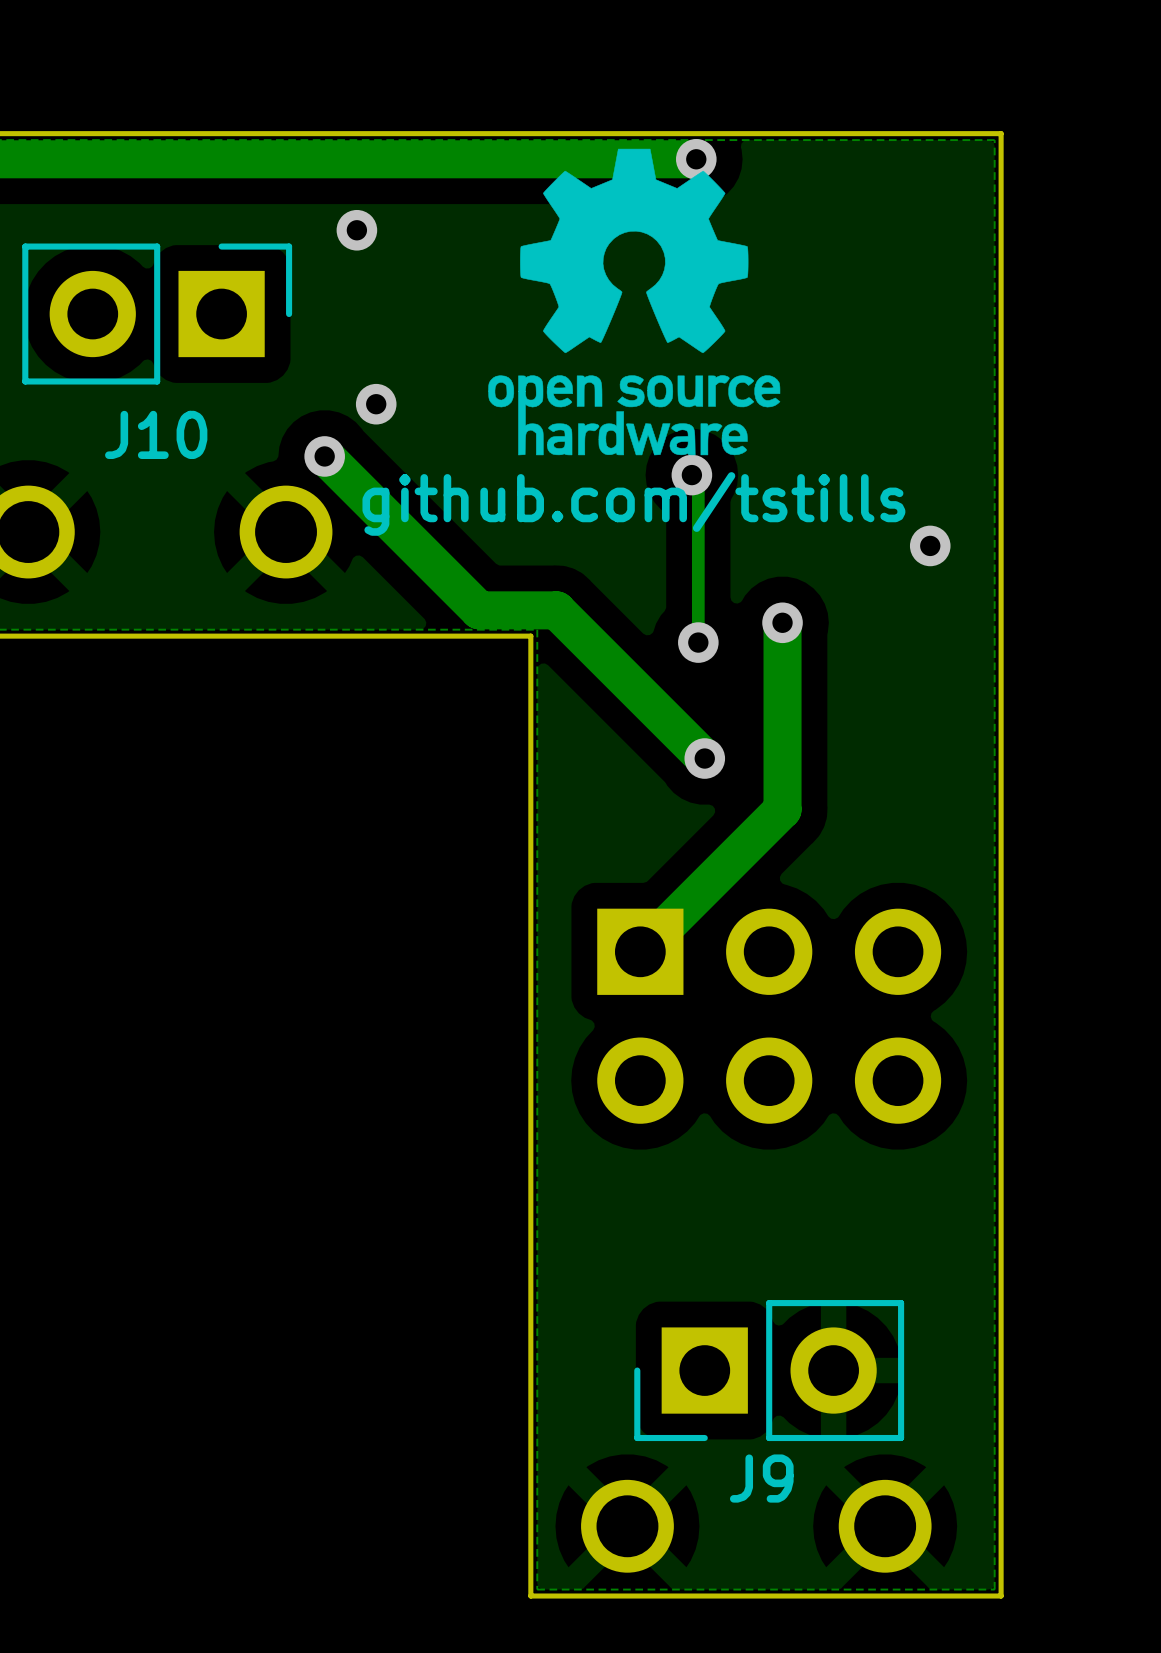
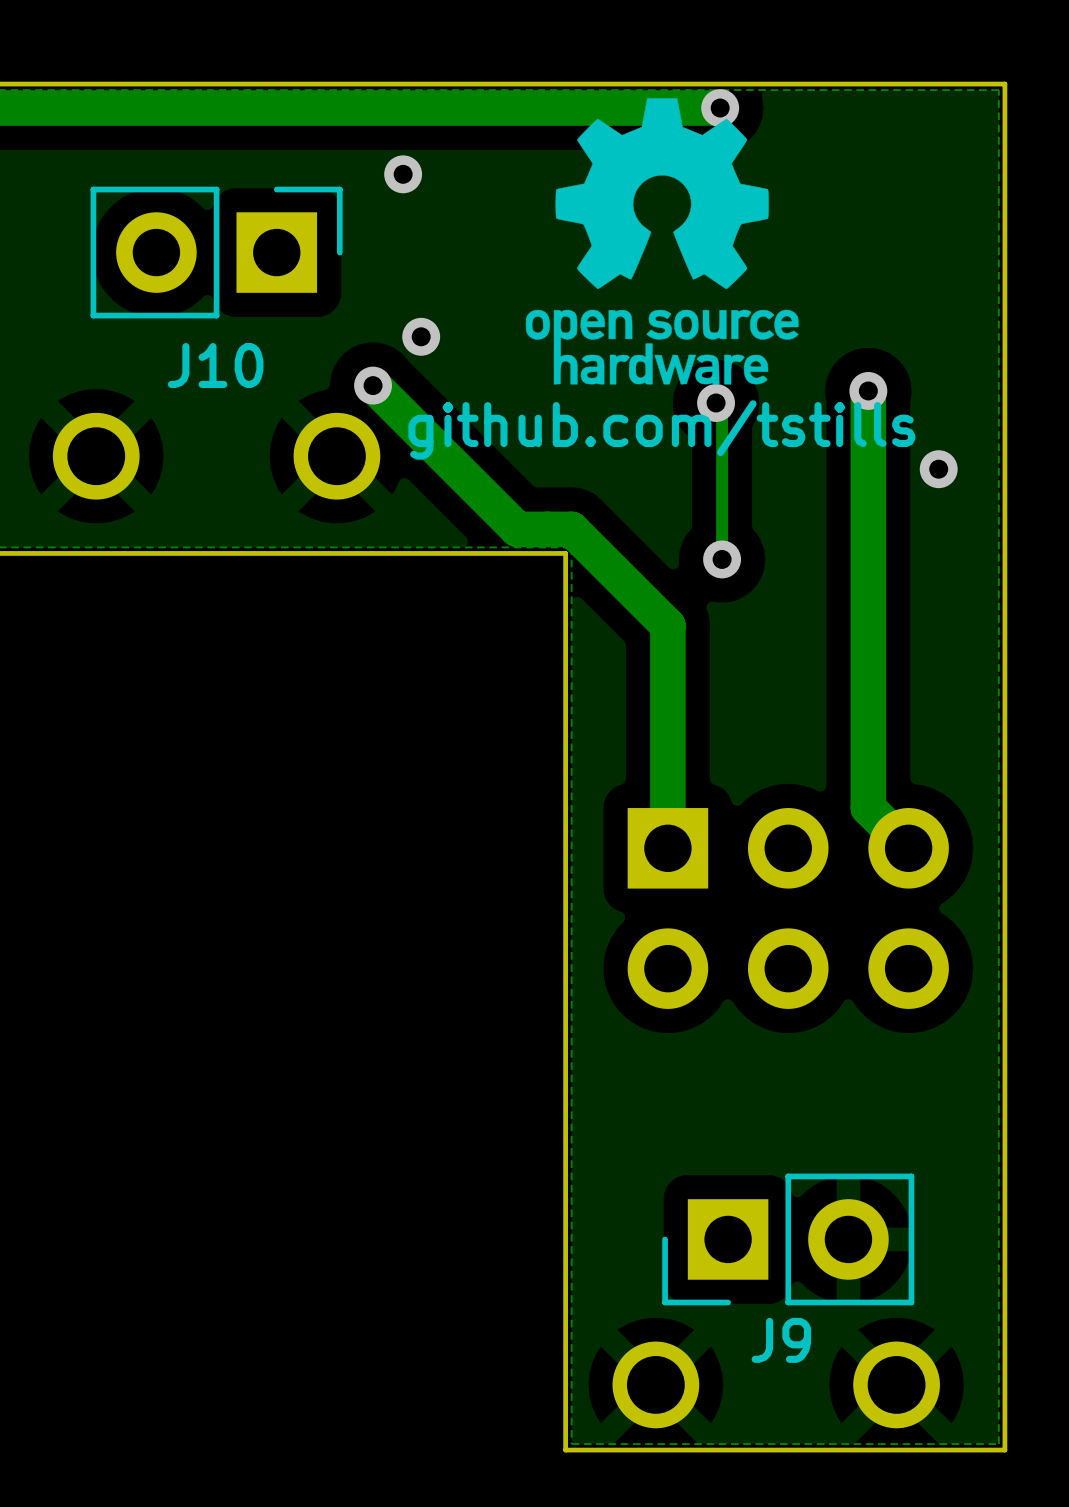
track: none -> (868, 390) (868, 808) (908, 848)
via: none -> (868, 390)
track: (537, 610) (556, 610) (704, 758) -> (571, 529) (667, 625) (667, 848)
track: (782, 622) (782, 809) (640, 951) -> none
via: (782, 622) -> none
via: (704, 758) -> none

